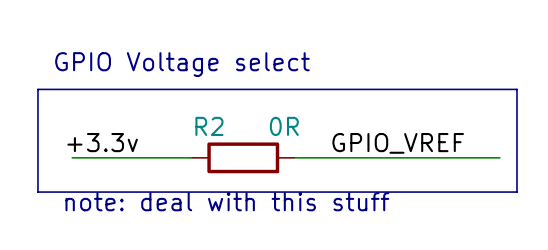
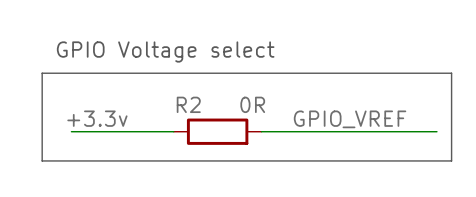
text: note: deal with this stuff (227, 201) -> none

